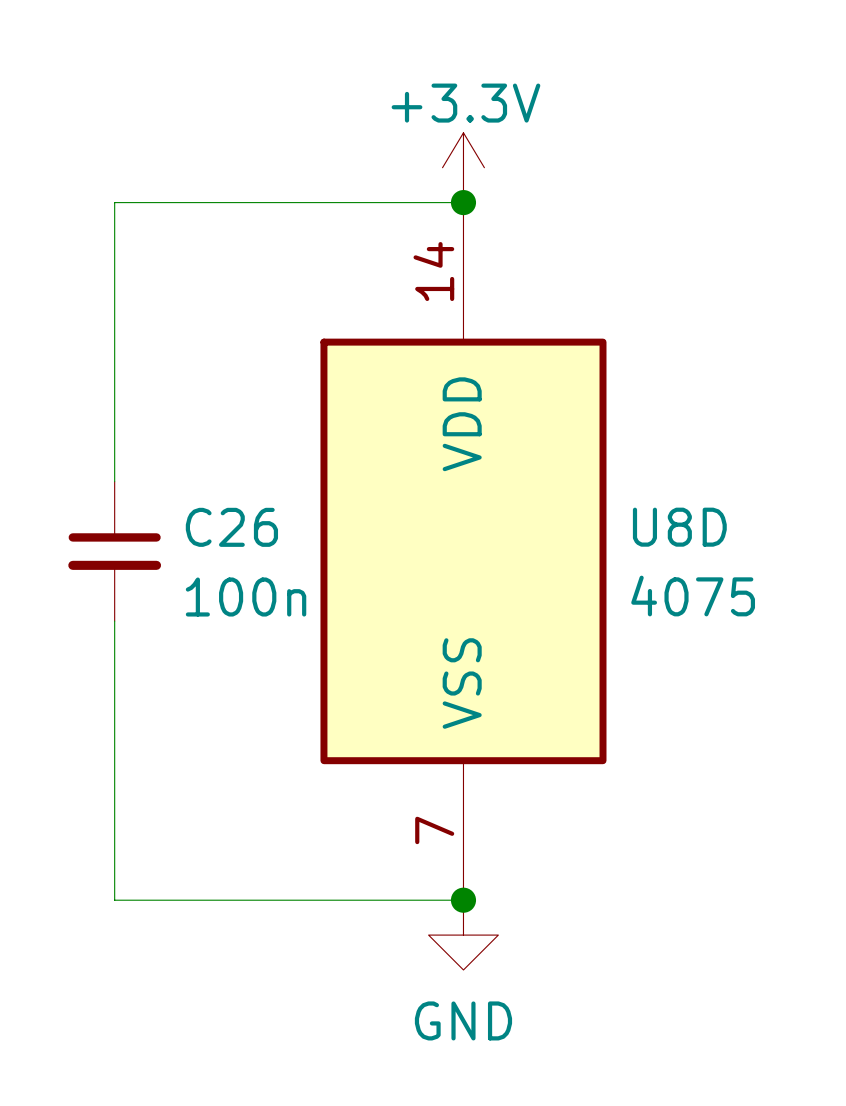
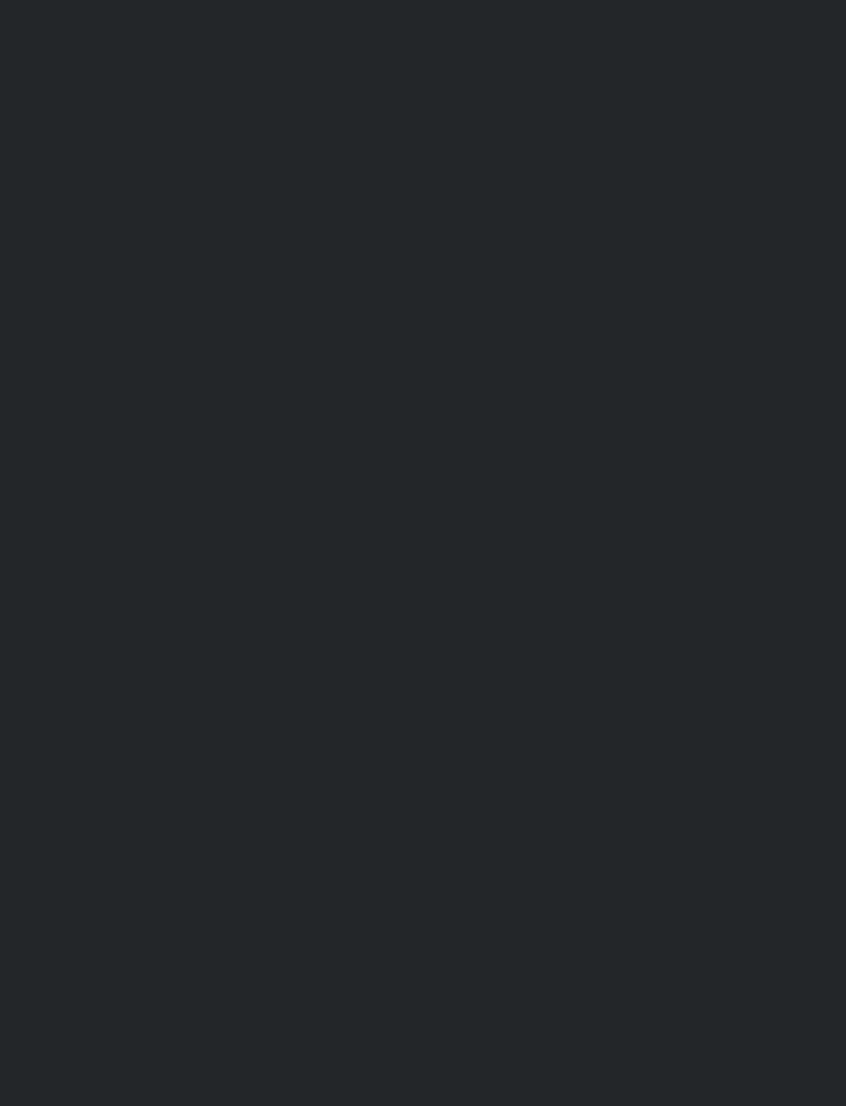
power symbol: +3.3V (463, 167) -> none
wire: (463, 202) (114, 202) (114, 481) -> none
junction: (463, 202) -> none
C26: 100n (114, 551) -> none
U8D: 4075 (463, 551) -> none
wire: (114, 621) (114, 900) (463, 900) -> none
junction: (463, 900) -> none
power symbol: GND (463, 935) -> none

